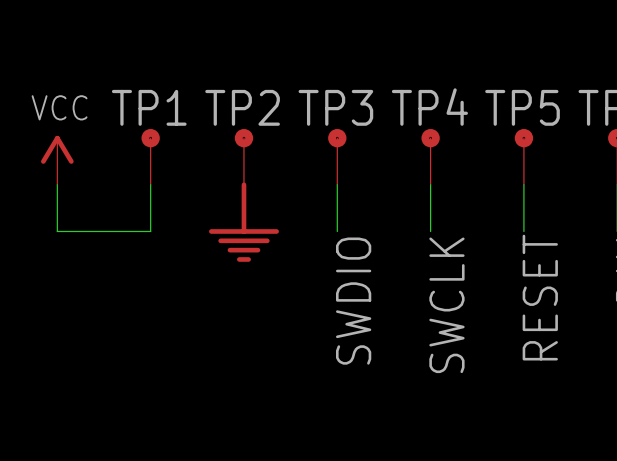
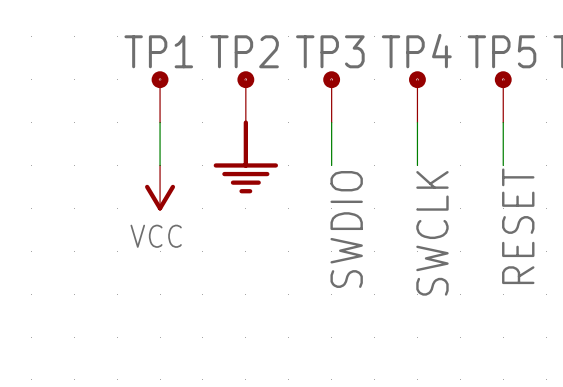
power symbol rotation: 0° (57, 149) -> 180° (160, 197)
power symbol position: VCC (57, 160) -> VCC (160, 188)
wire: (57, 184) (57, 231) (150, 231) -> none

